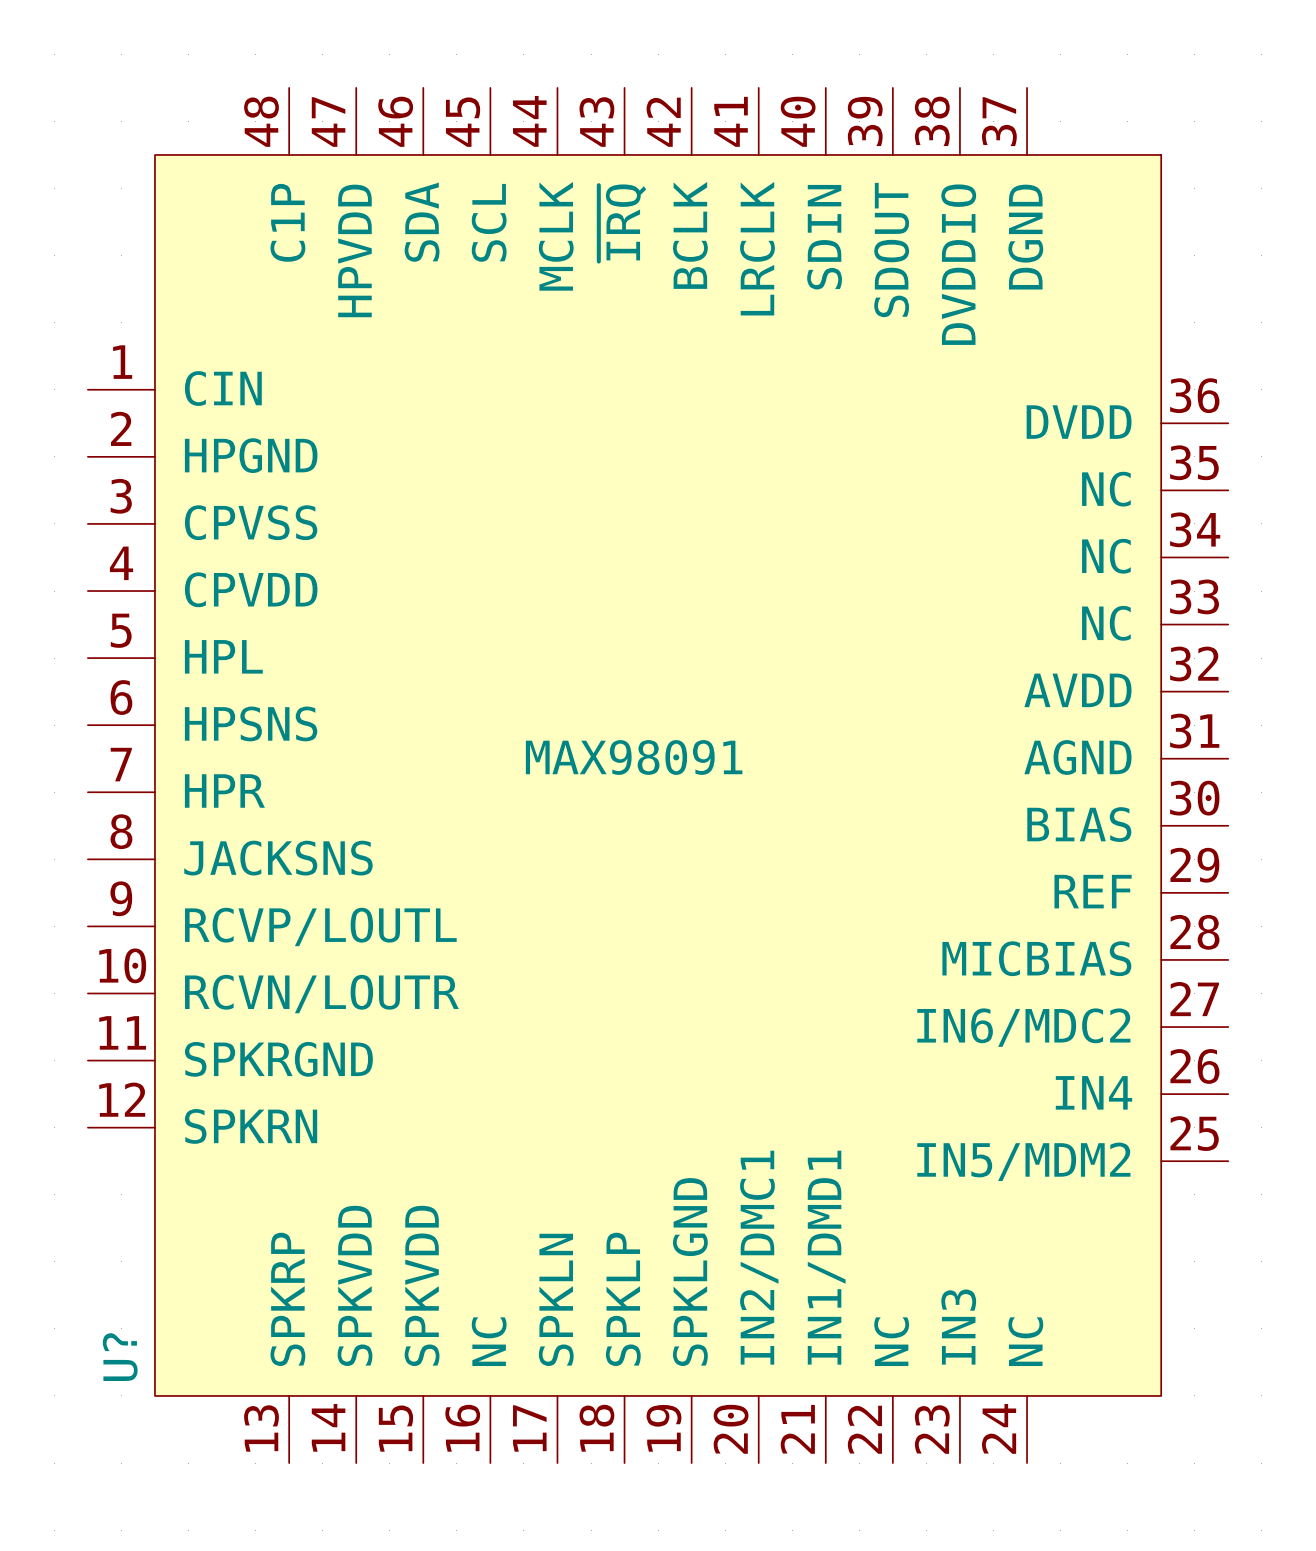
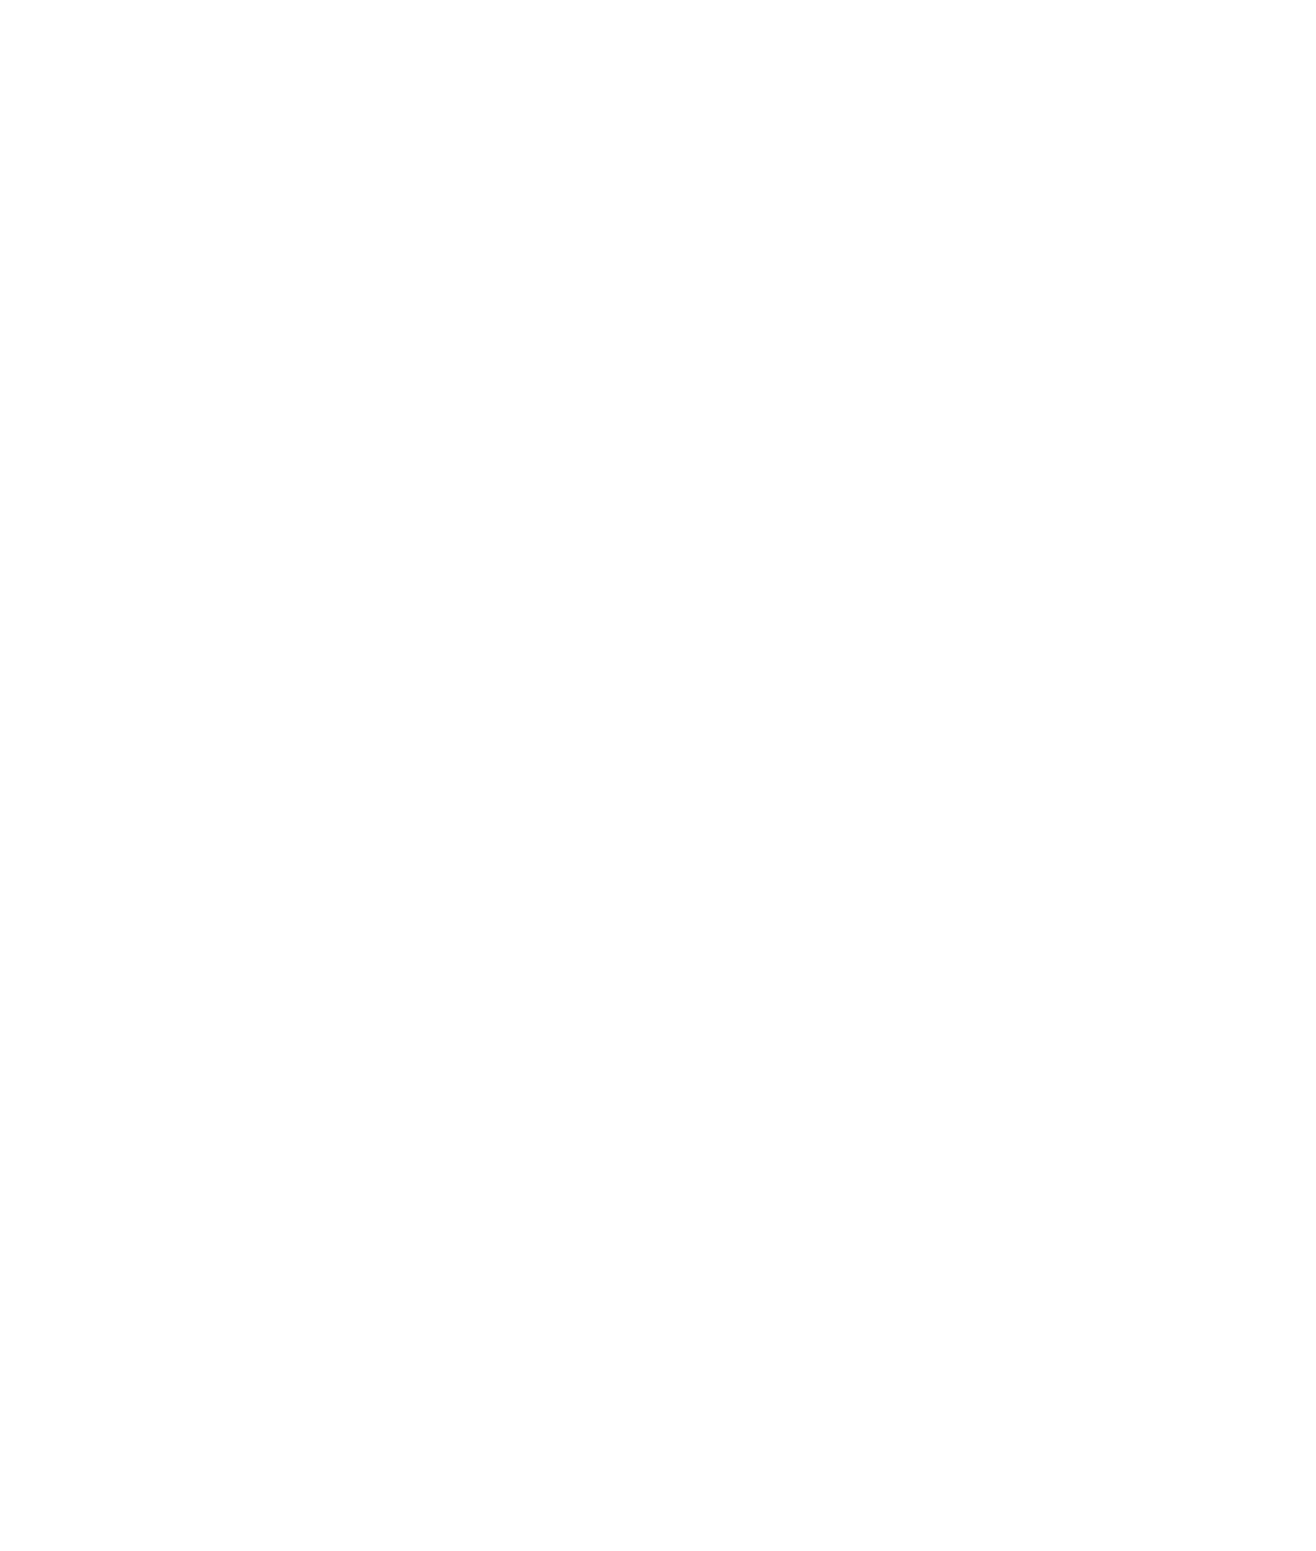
U?: MAX98091 (658, 775) -> none

